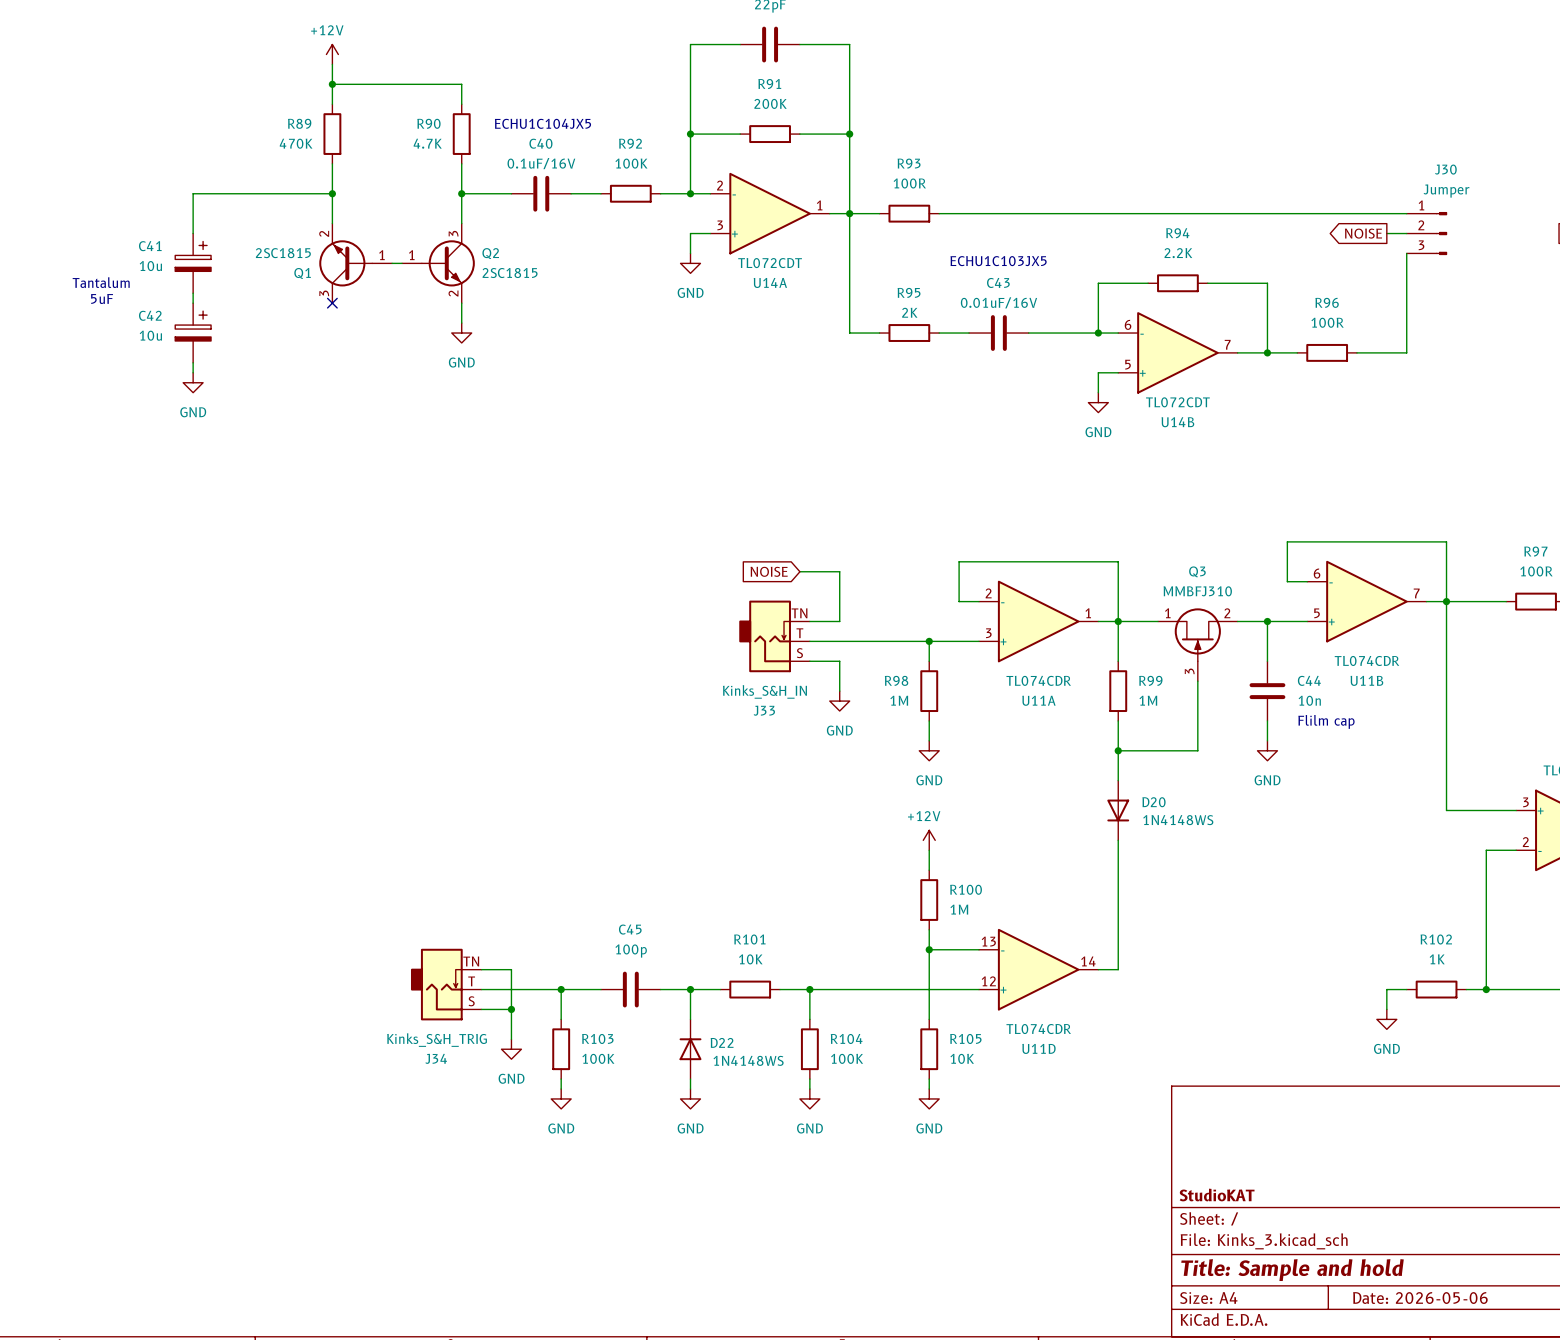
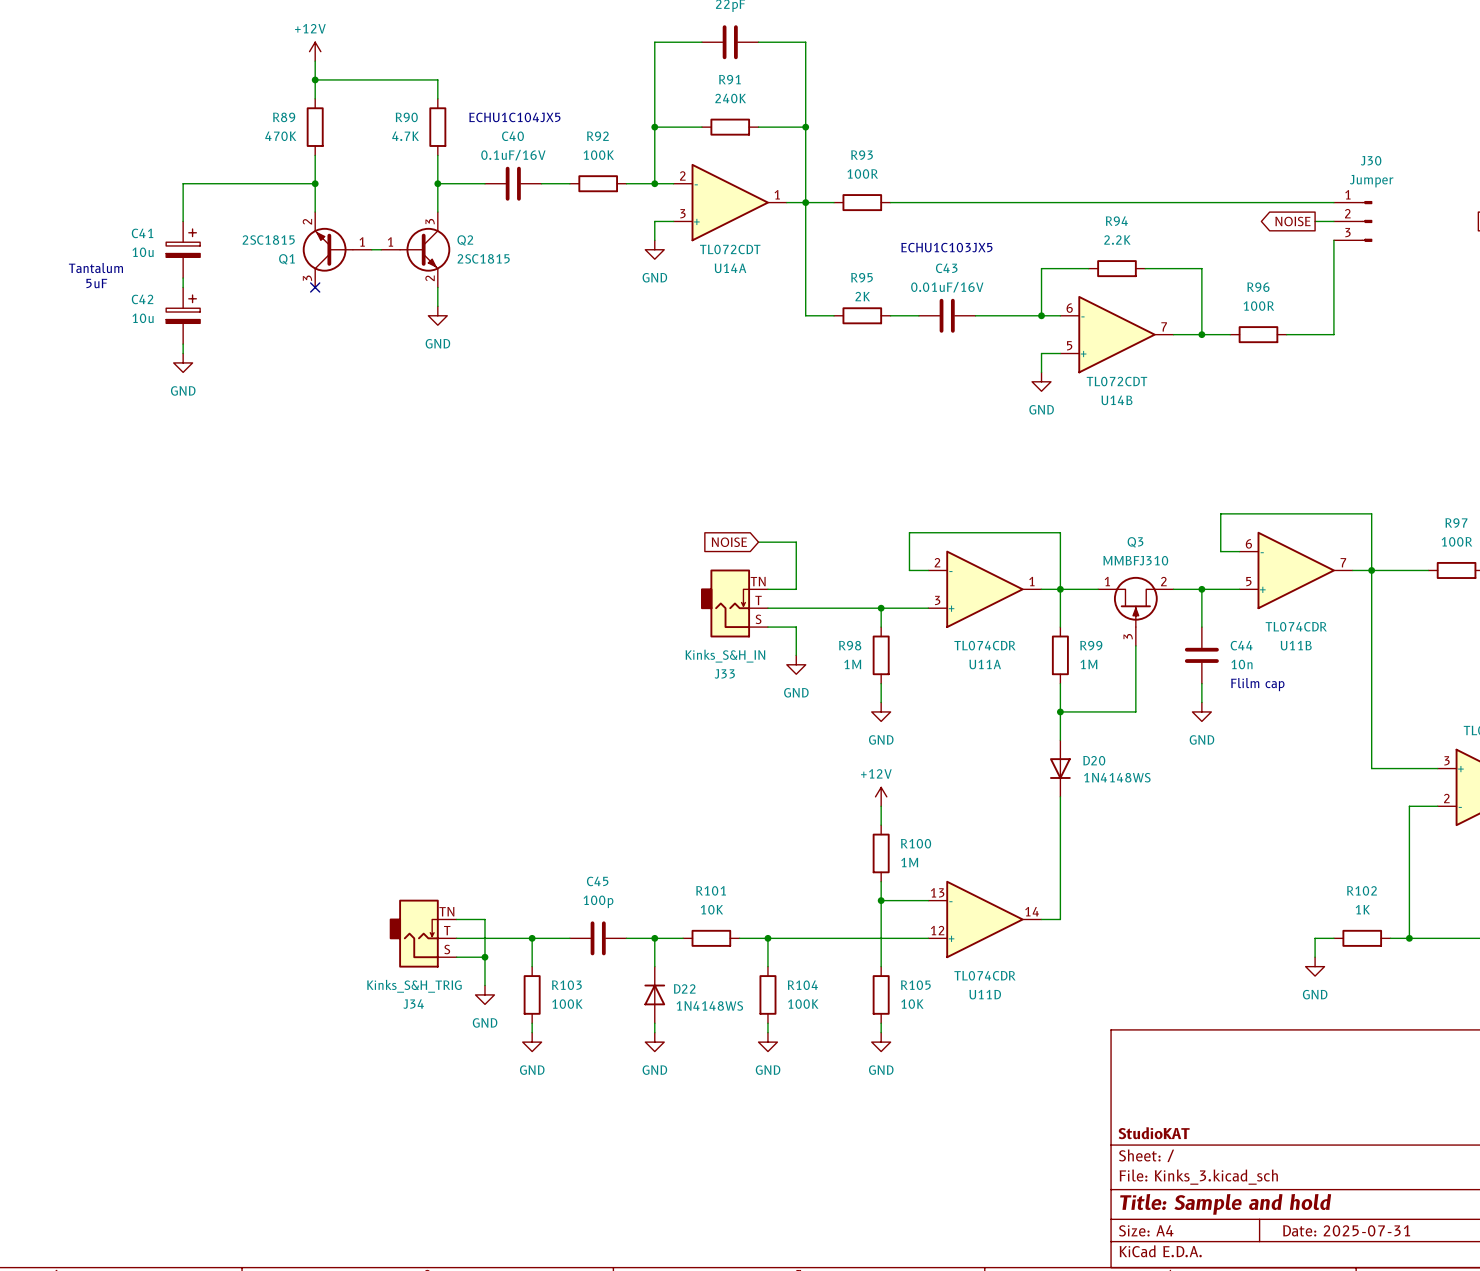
R91 value: 200K (770, 103) -> 240K (730, 98)
title block: Date: 2026-05-06 (1420, 1298) -> Date: 2025-07-31 (1346, 1230)

